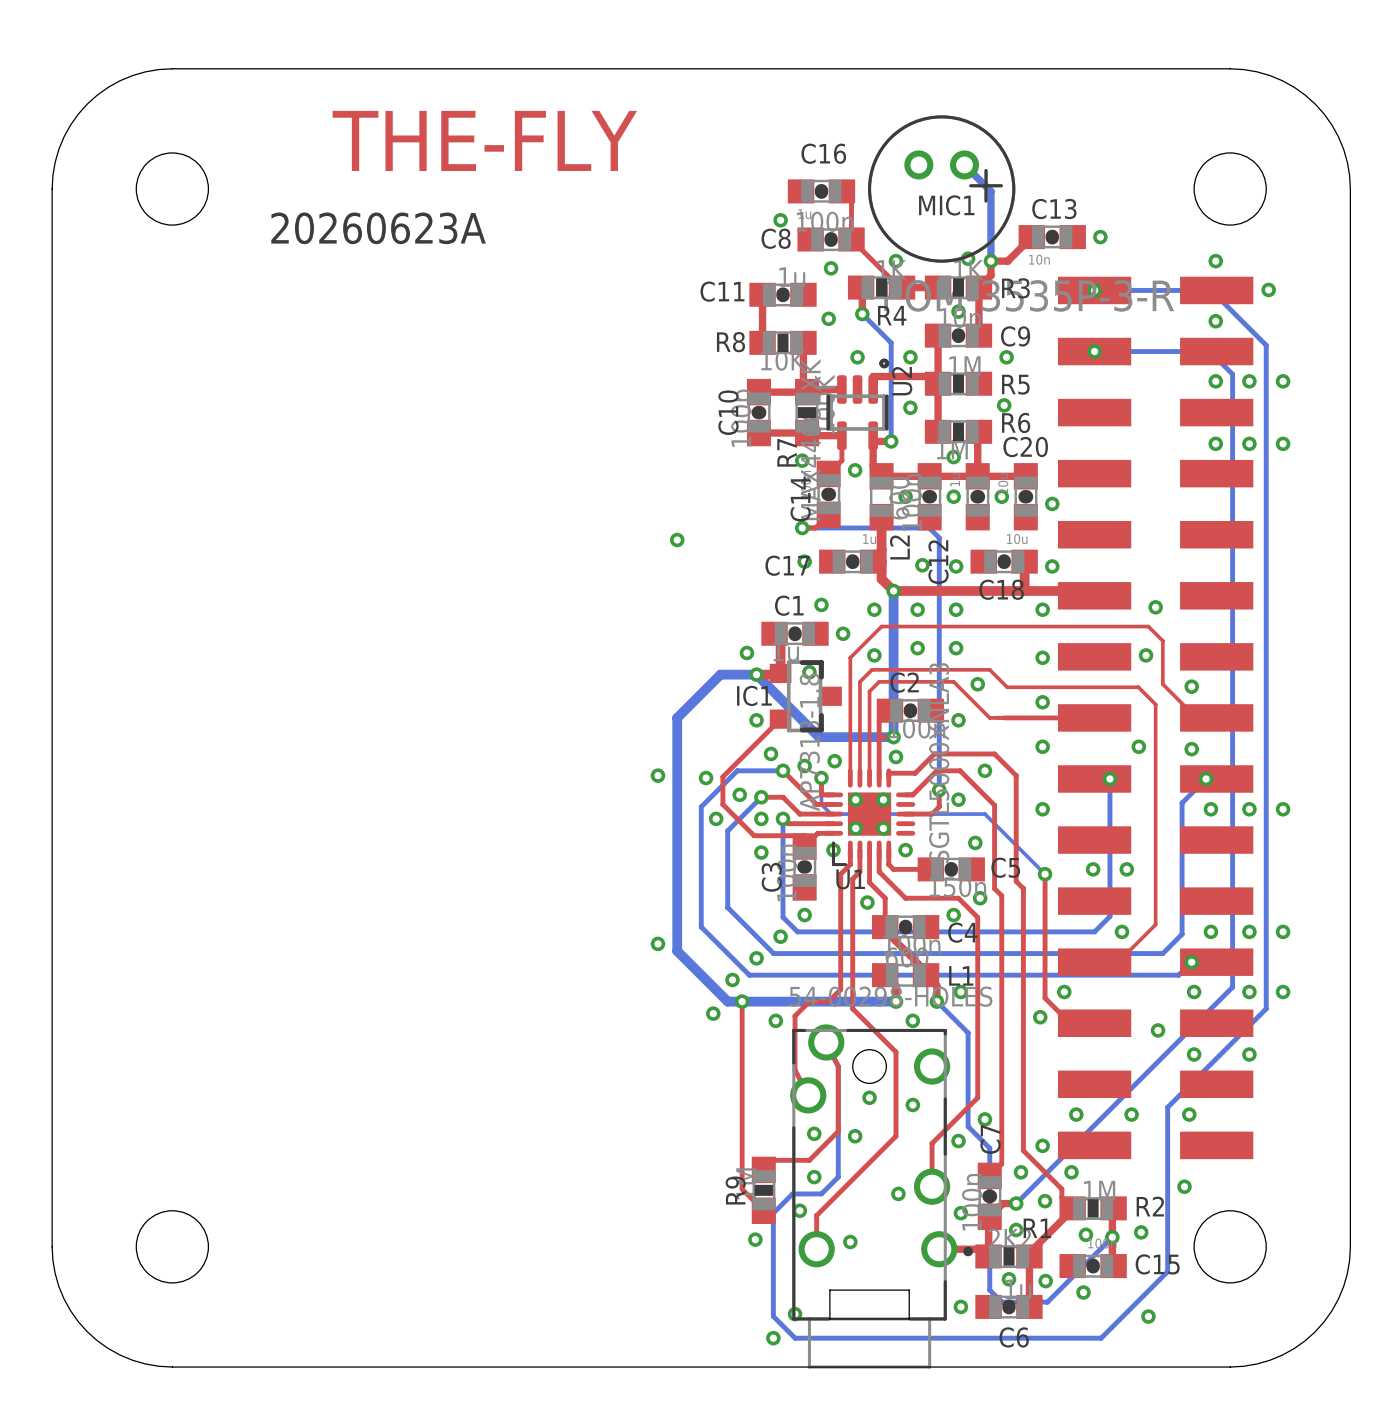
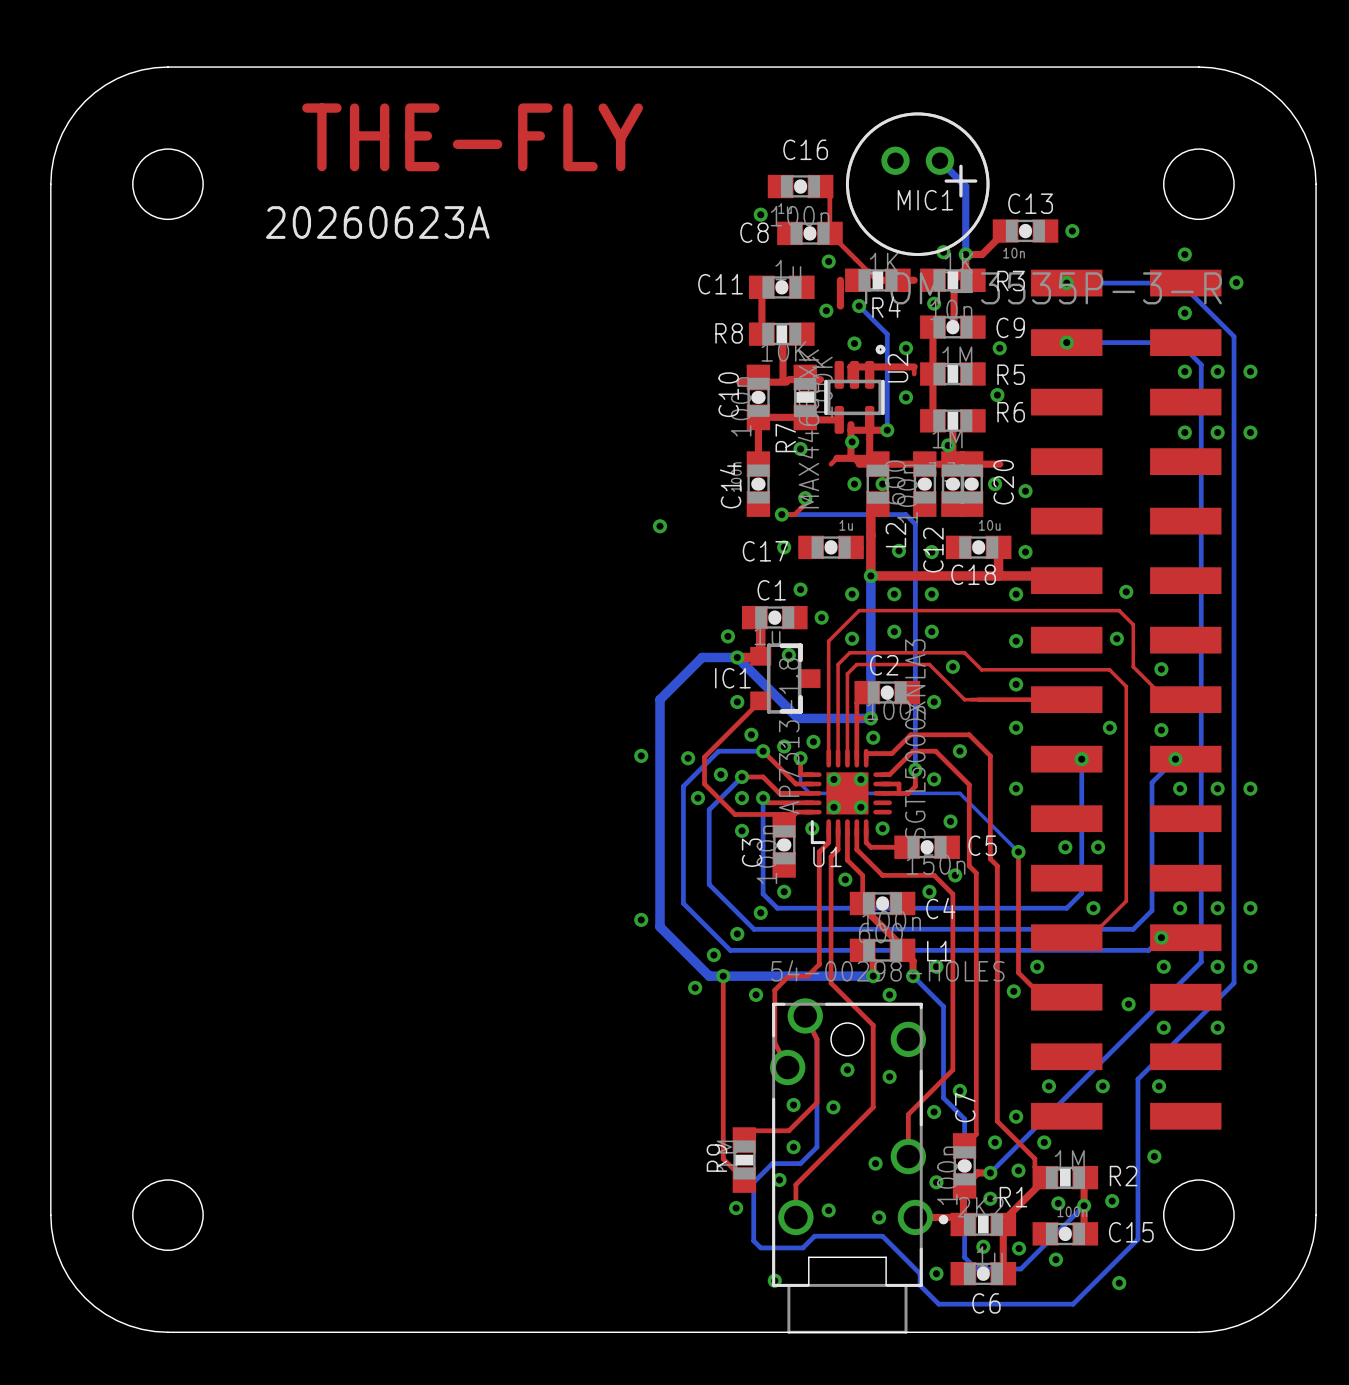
via: (896, 261) -> none
via position: (831, 268) -> (828, 261)
R4 position: (881, 287) -> (877, 280)
R3 position: (958, 287) -> (952, 280)
top track: (762, 294) (762, 342) -> (761, 287) (761, 334)
C11 position: (783, 294) -> (781, 287)
bottom track: (862, 314) (891, 342) (891, 441) -> (859, 306) (887, 334) (887, 430)
via position: (862, 314) -> (826, 310)
via: none -> (859, 306)
via: (828, 318) -> none
top track: (938, 335) (938, 431) -> (932, 327) (932, 420)
C9 position: (958, 335) -> (952, 327)
R8 position: (783, 342) -> (781, 334)
via: none -> (854, 343)
via: (857, 357) -> none
via: (910, 357) -> none
via: none -> (906, 348)
via position: (1006, 357) -> (999, 348)
R5 position: (958, 383) -> (952, 373)
U2 position: (857, 404) -> (854, 389)
via position: (1004, 405) -> (997, 395)
via: (910, 407) -> none
via: none -> (906, 397)
C10 position: (758, 412) -> (758, 397)
R7 position: (807, 412) -> (805, 397)
top track: none -> (839, 419) (758, 417) (758, 464)
R6 position: (958, 431) -> (952, 420)
top track: (758, 433) (807, 433) (809, 435) (841, 435) (841, 460) (828, 473) -> none
via: (891, 441) -> none
top track: none -> (887, 430) (869, 430) (869, 419) (869, 455) (877, 464) (877, 458) (836, 458) (831, 464)
via: none -> (887, 430)
C20 name rotation: 0° (1025, 447) -> 90° counterclockwise (1003, 482)
via: none -> (852, 441)
via position: (953, 457) -> (948, 445)
via: (802, 460) -> none
via: none -> (800, 448)
via: (855, 470) -> none
C14 position: (828, 494) -> (758, 484)
via: none -> (854, 484)
L2 position: (881, 496) -> (877, 484)
C12 position: (929, 496) -> (924, 484)
via: (953, 496) -> none
via position: (1001, 496) -> (995, 484)
C20 position: (1025, 496) -> (971, 484)
via: none -> (805, 498)
top track: (881, 517) (881, 578) (893, 590) -> (877, 504) (870, 511) (870, 575)
top track: none -> (882, 784) (898, 784) (898, 793)
part footprint: [790, 1024, 973, 1369] -> [770, 998, 949, 1334]
via: none -> (879, 1217)
bottom track: (773, 1273) (773, 1316) (795, 1338) (963, 1338) -> (753, 1240) (760, 1247) (802, 1247) (814, 1236) (882, 1236) (920, 1273) (920, 1285) (938, 1304)
via: (773, 1338) -> none

